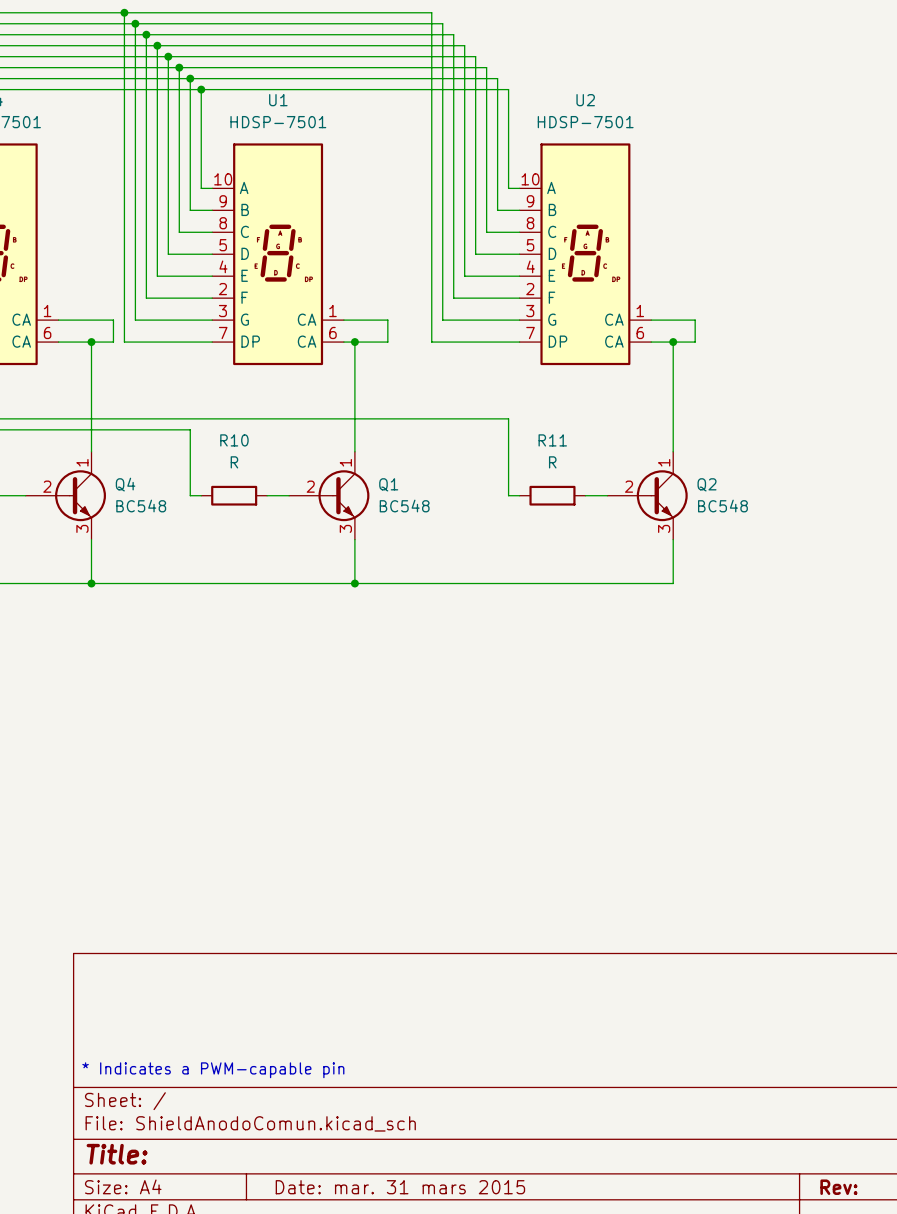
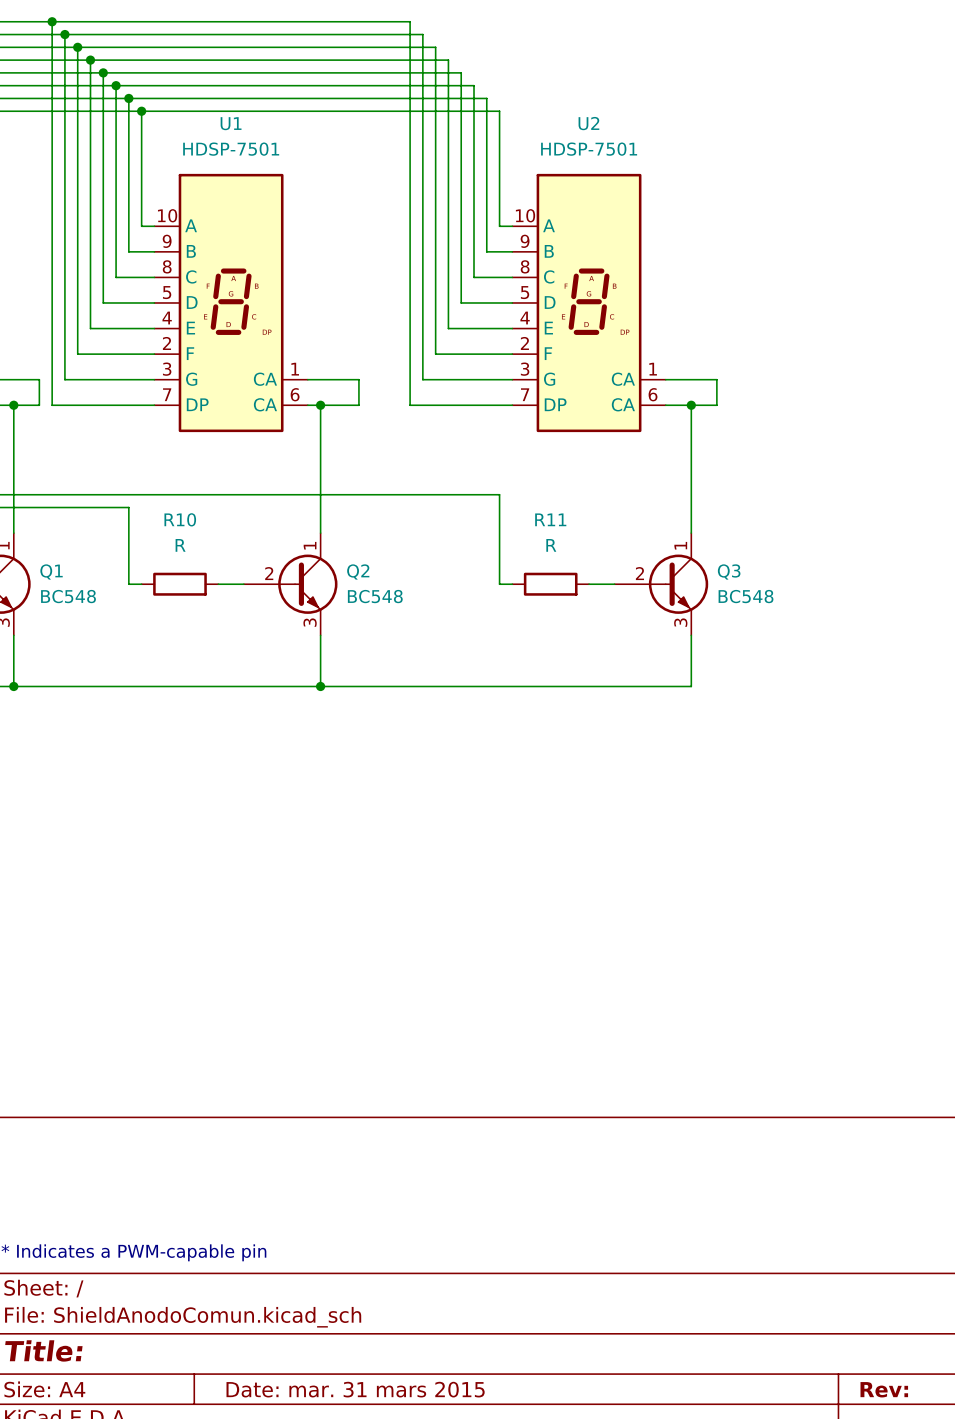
Q4 name: Q4 (125, 484) -> Q1 (51, 571)
Q1 name: Q1 (388, 484) -> Q2 (358, 571)
Q2 name: Q2 (707, 484) -> Q3 (729, 571)

